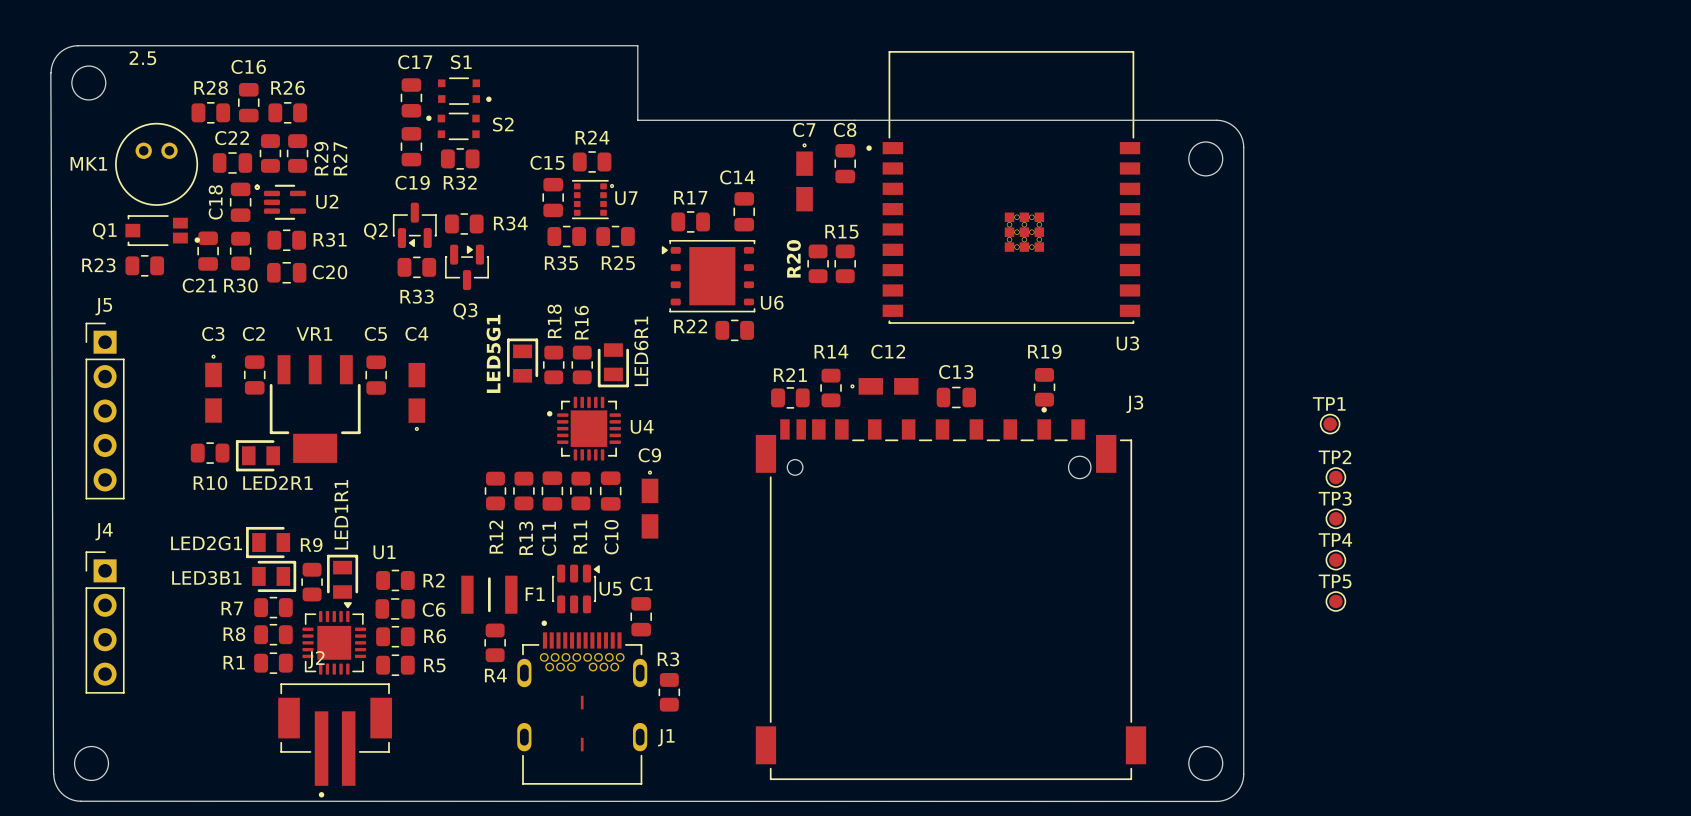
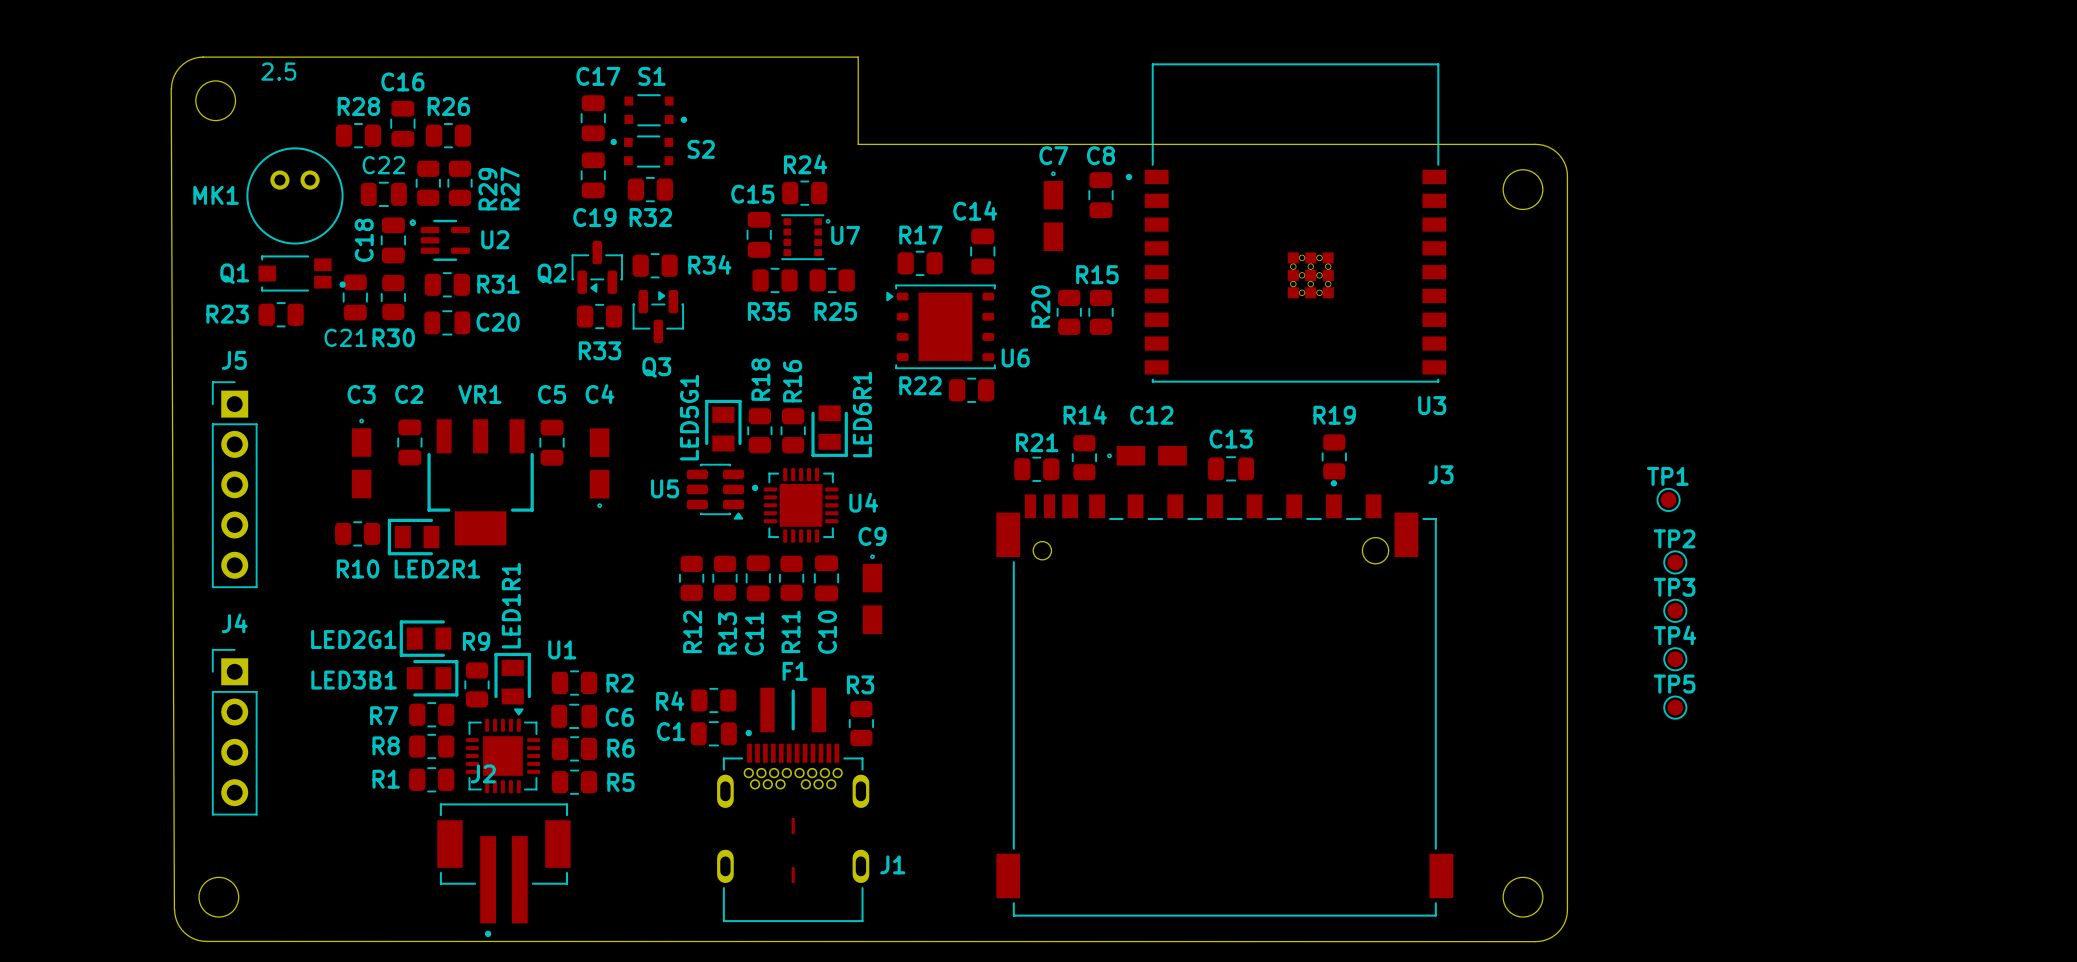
C1 name position: C1 (641, 583) -> C1 (671, 731)
U5 rotation: 0° (575, 588) -> 90° clockwise (715, 491)
U5 position: (575, 588) -> (715, 491)
U5 name position: U5 (610, 588) -> U5 (665, 488)
F1 position: (489, 594) -> (793, 710)
F1 name position: F1 (535, 594) -> F1 (795, 671)
C1 rotation: 0° (641, 616) -> 90° clockwise (713, 733)
C1 position: (641, 616) -> (713, 733)
R4 rotation: 0° (495, 642) -> 90° clockwise (713, 700)
R4 position: (495, 642) -> (713, 700)
R3 position: (669, 692) -> (861, 723)

